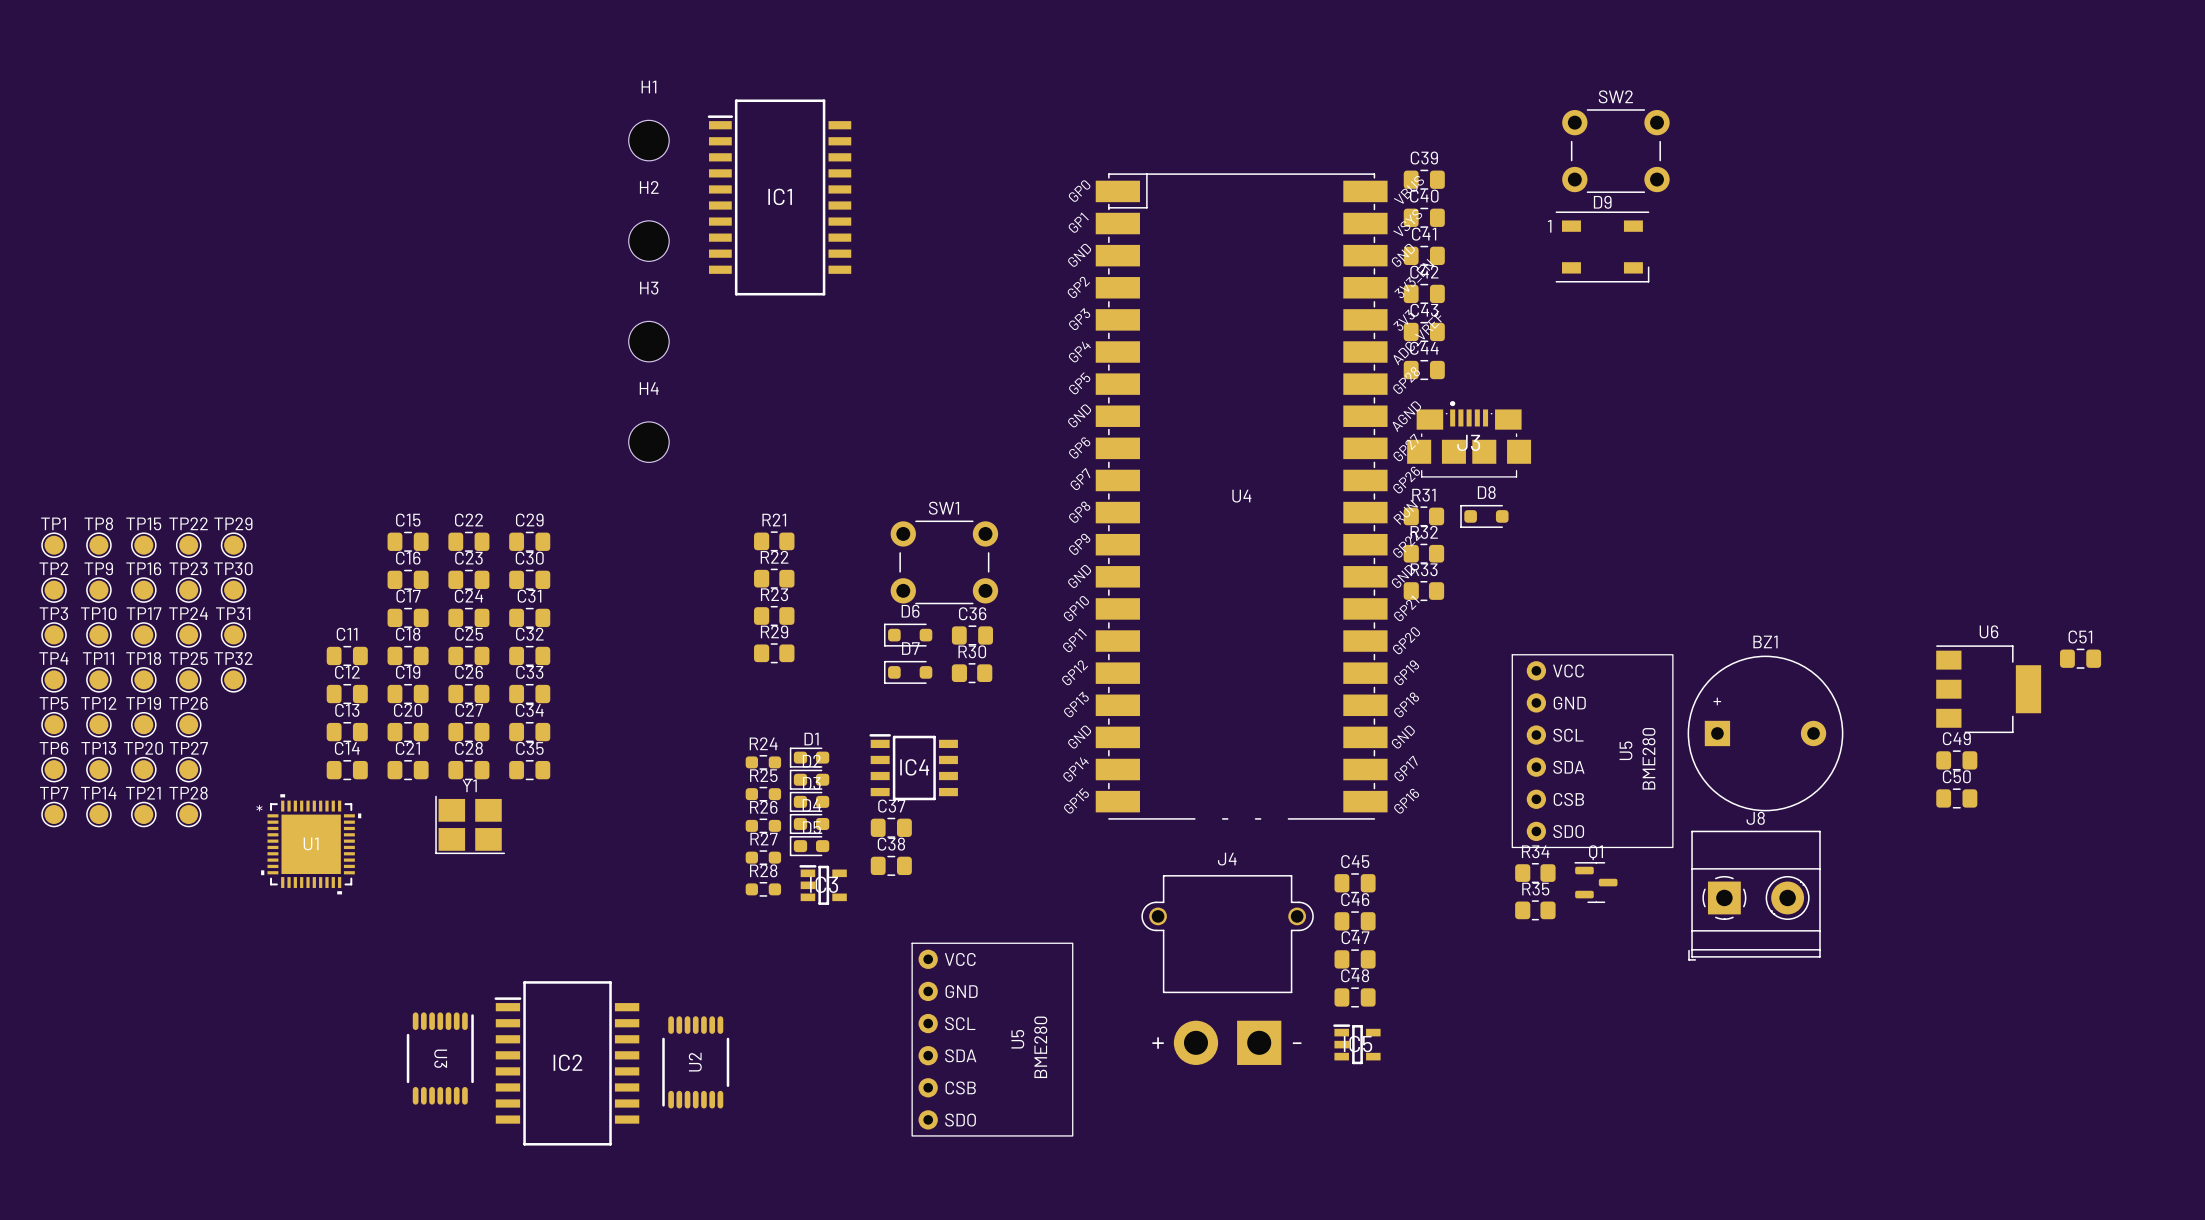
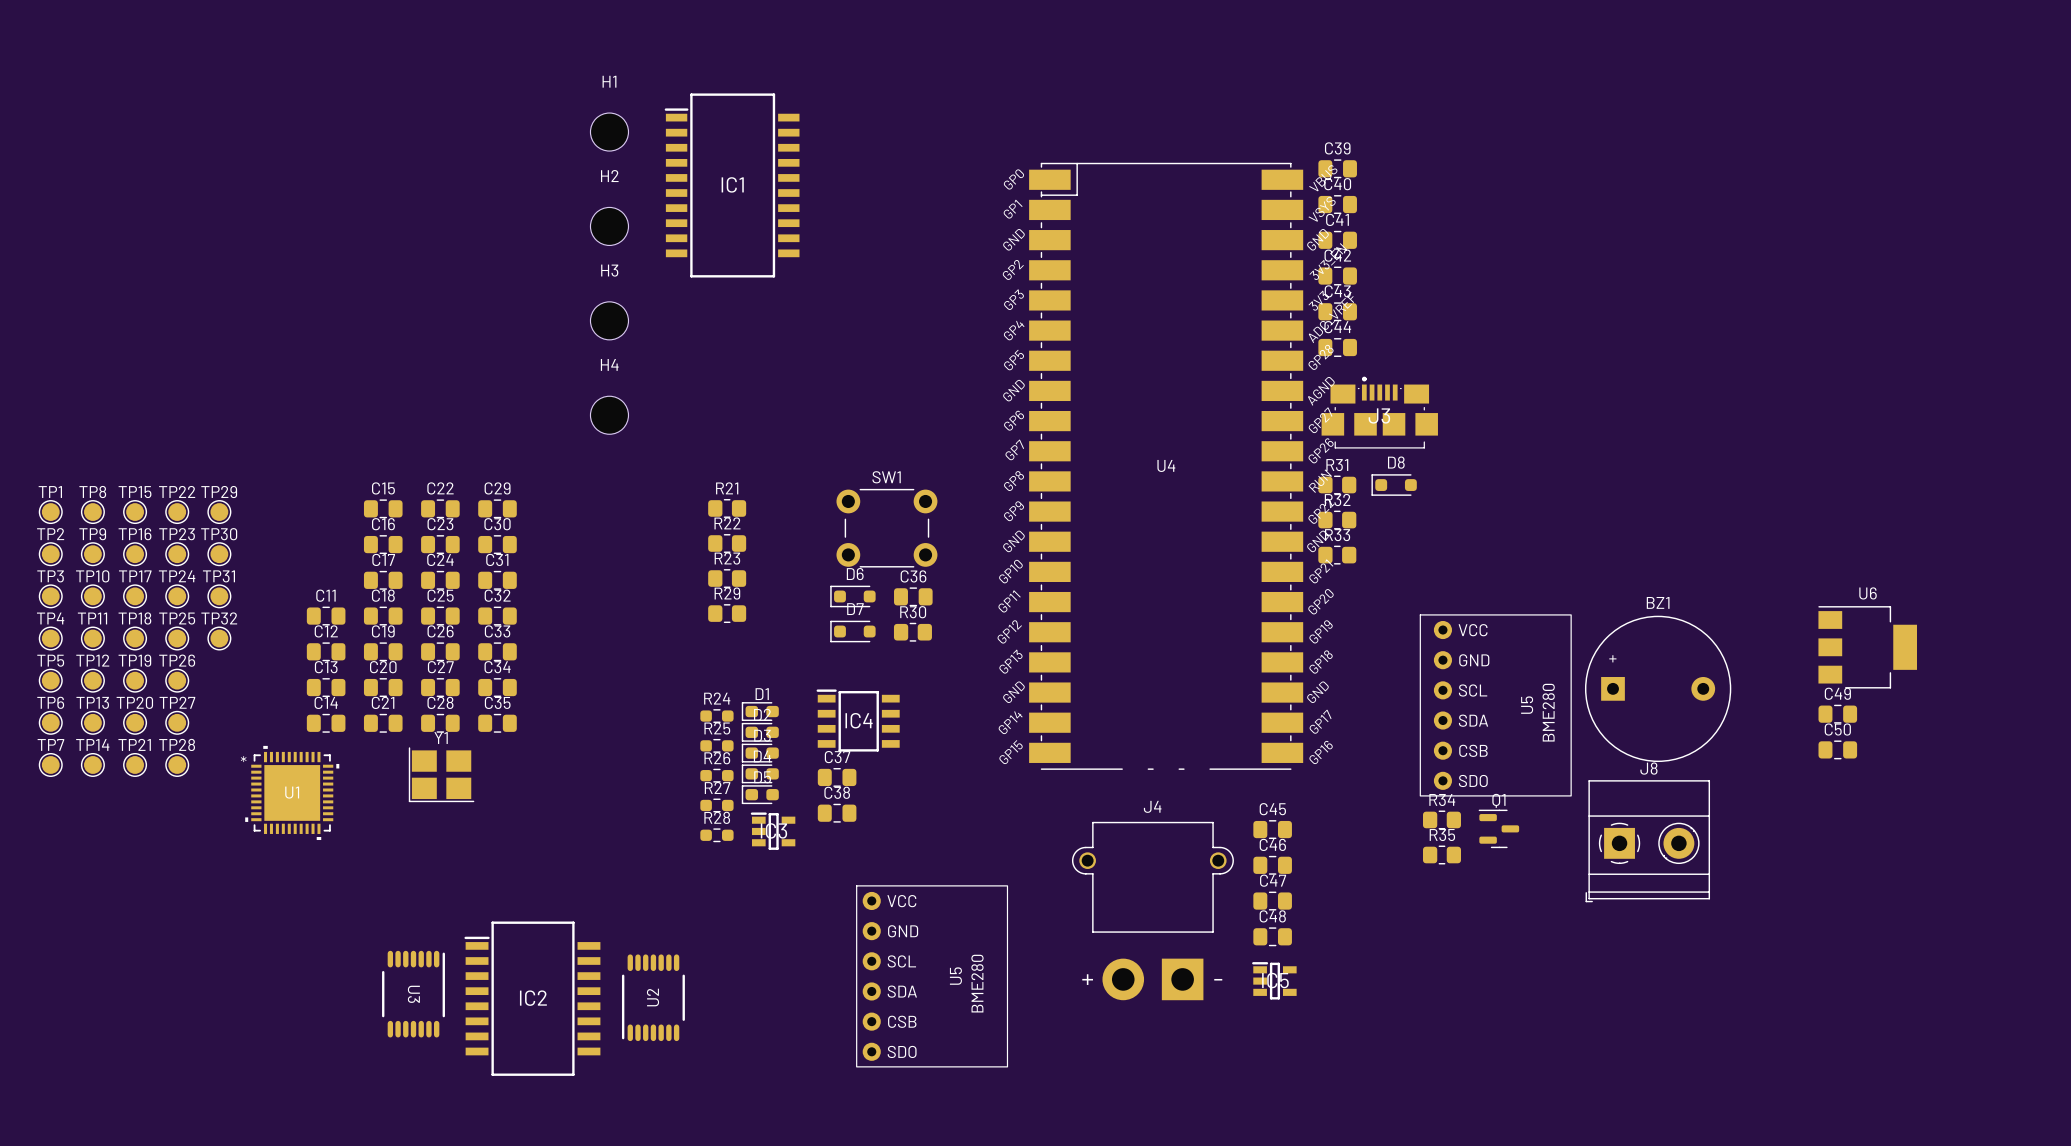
SW2: (1615, 151) -> none
D9: (1602, 246) -> none
C51: (2080, 658) -> none

